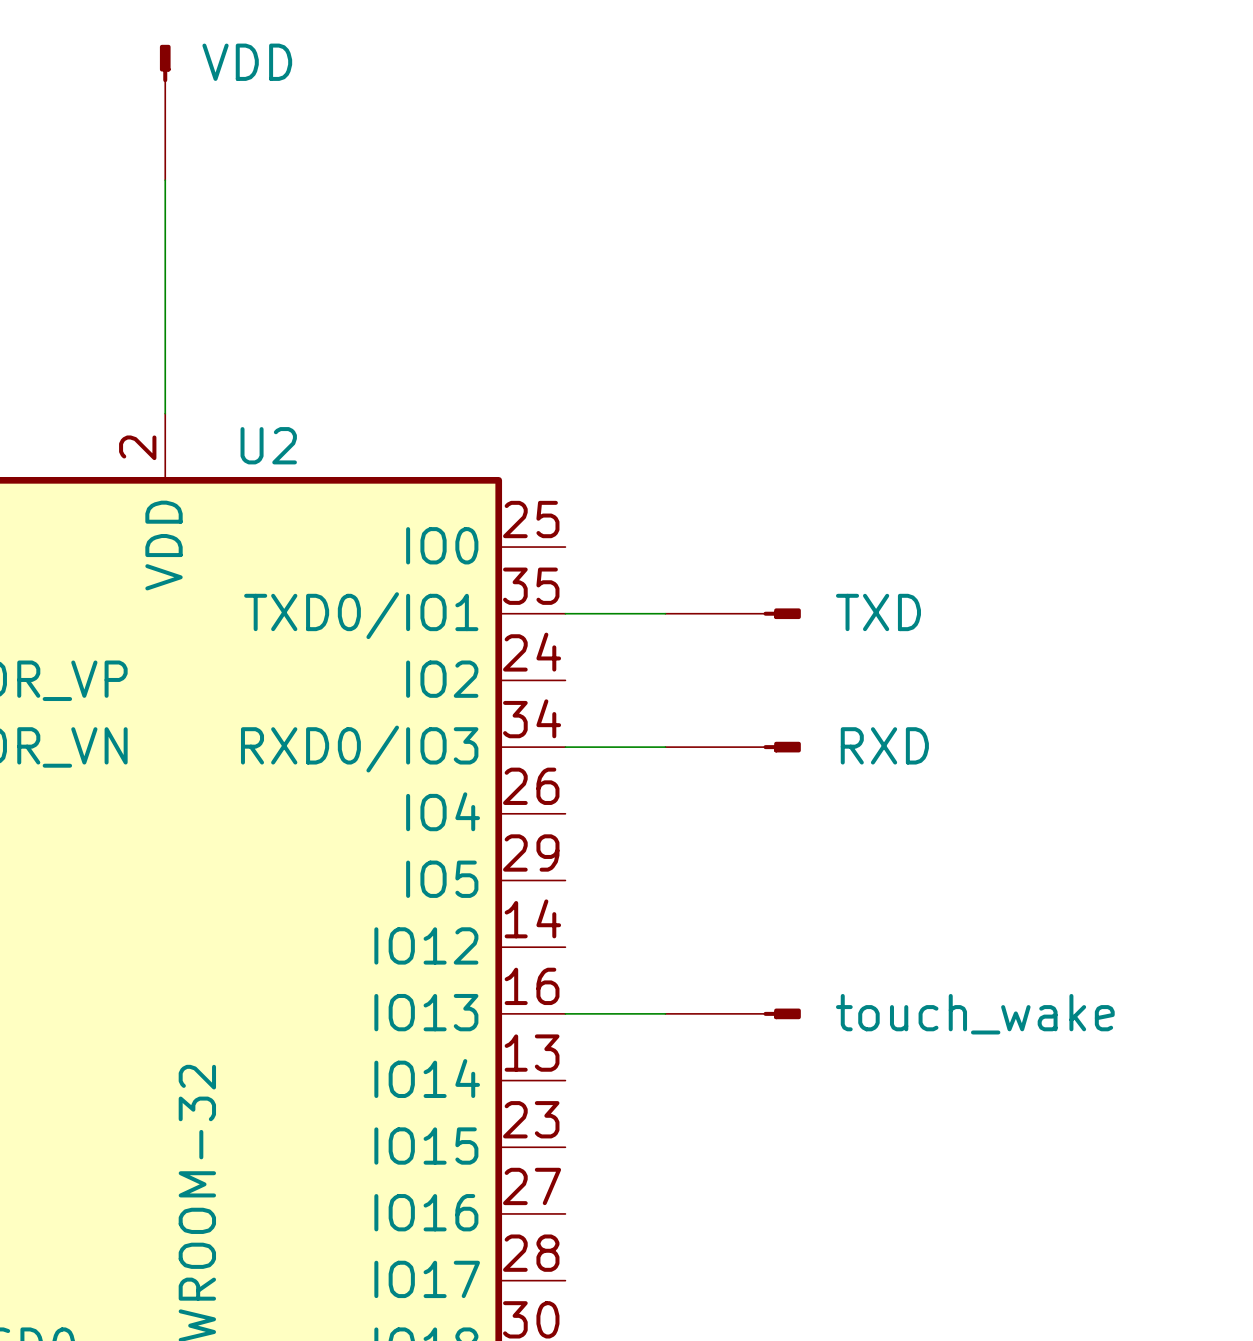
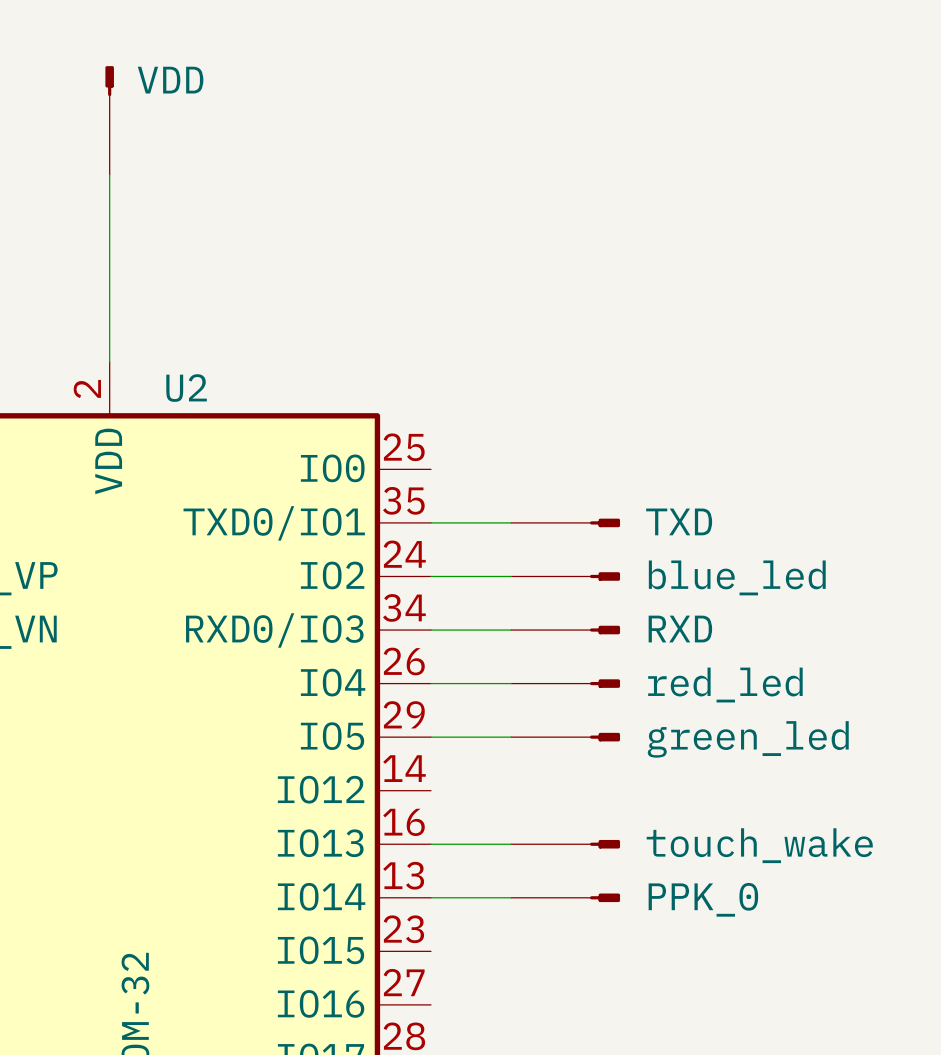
wire: none -> (430, 576) (511, 576)
part: none -> blue_led (565, 576)
wire: none -> (430, 683) (511, 683)
part: none -> red_led (565, 683)
wire: none -> (430, 737) (511, 737)
part: none -> green_led (565, 737)
wire: none -> (430, 897) (511, 897)
part: none -> PPK_0 (565, 897)

